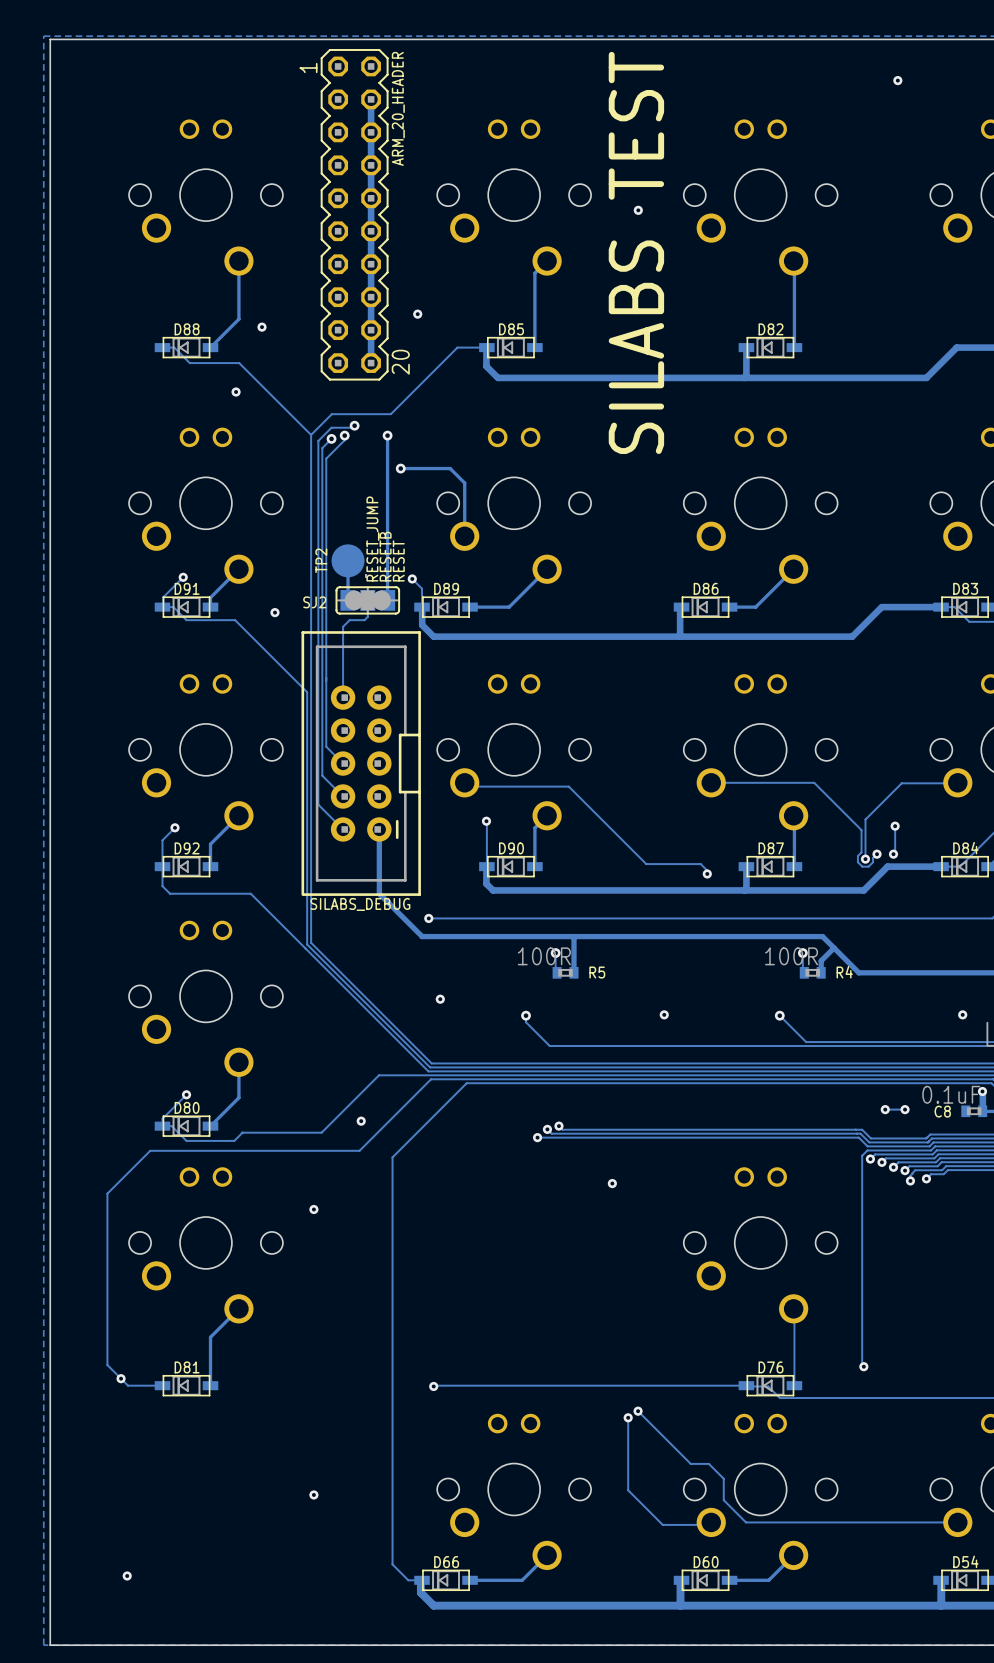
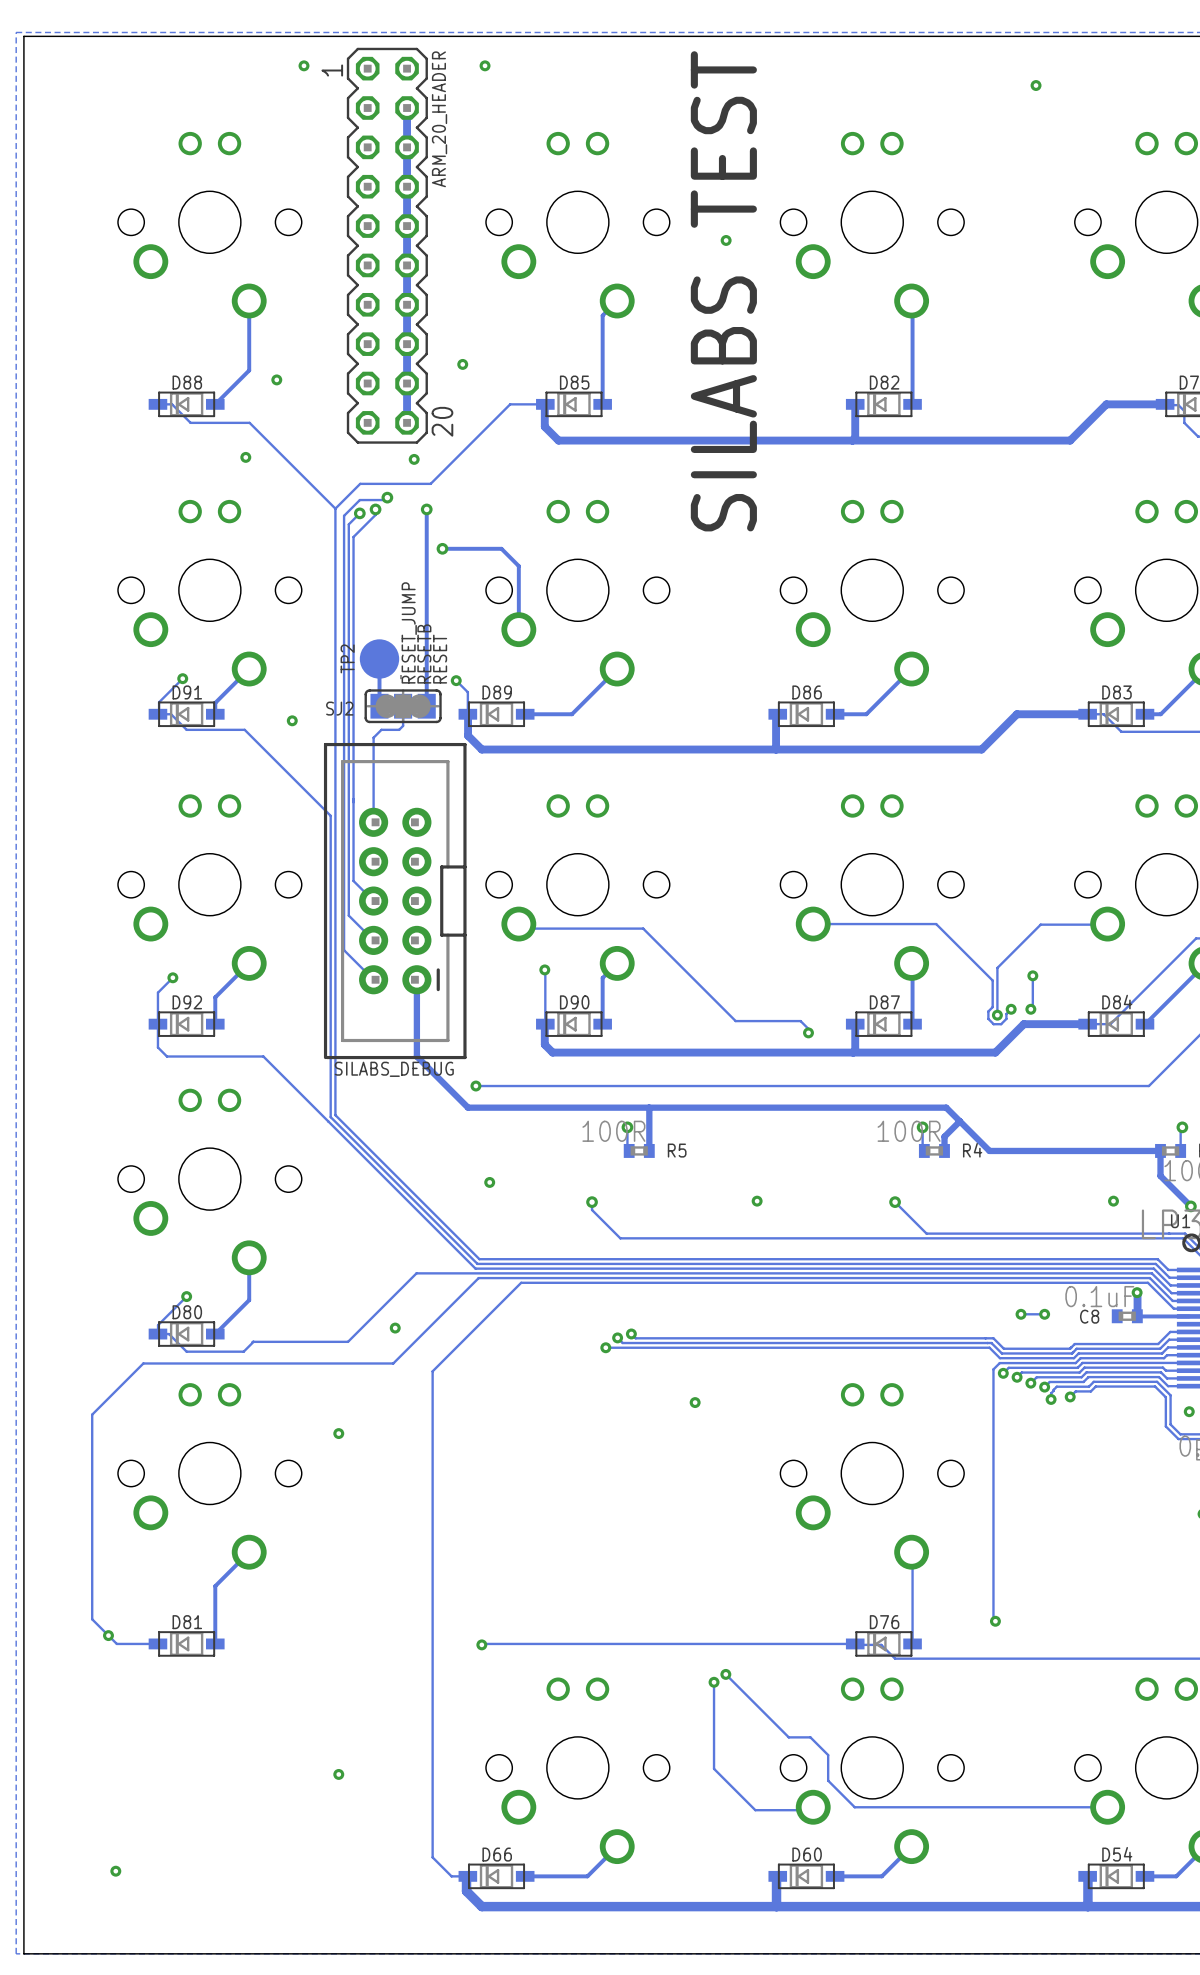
via: none -> (303, 65)
via: none -> (485, 65)
via: none -> (414, 459)

